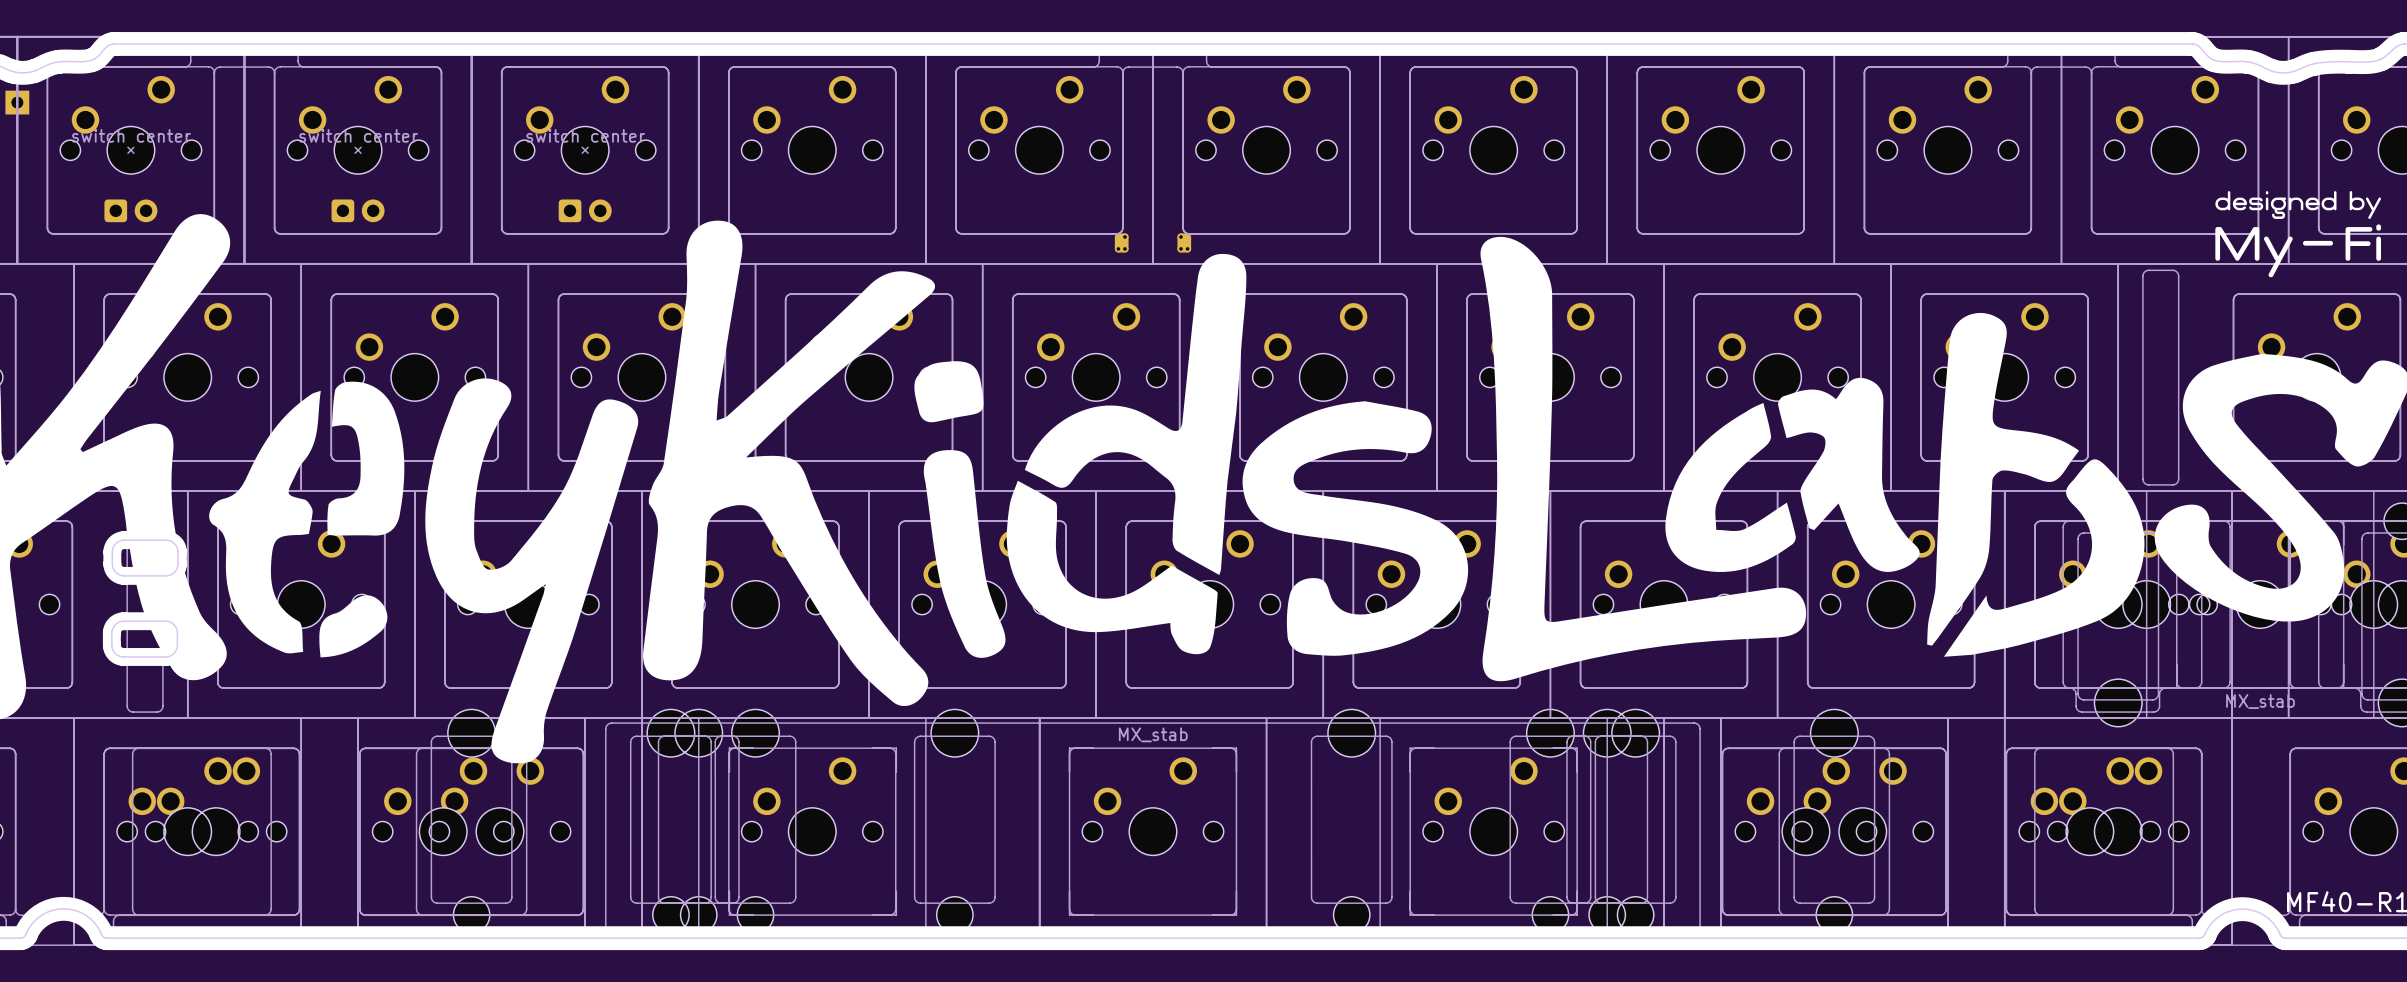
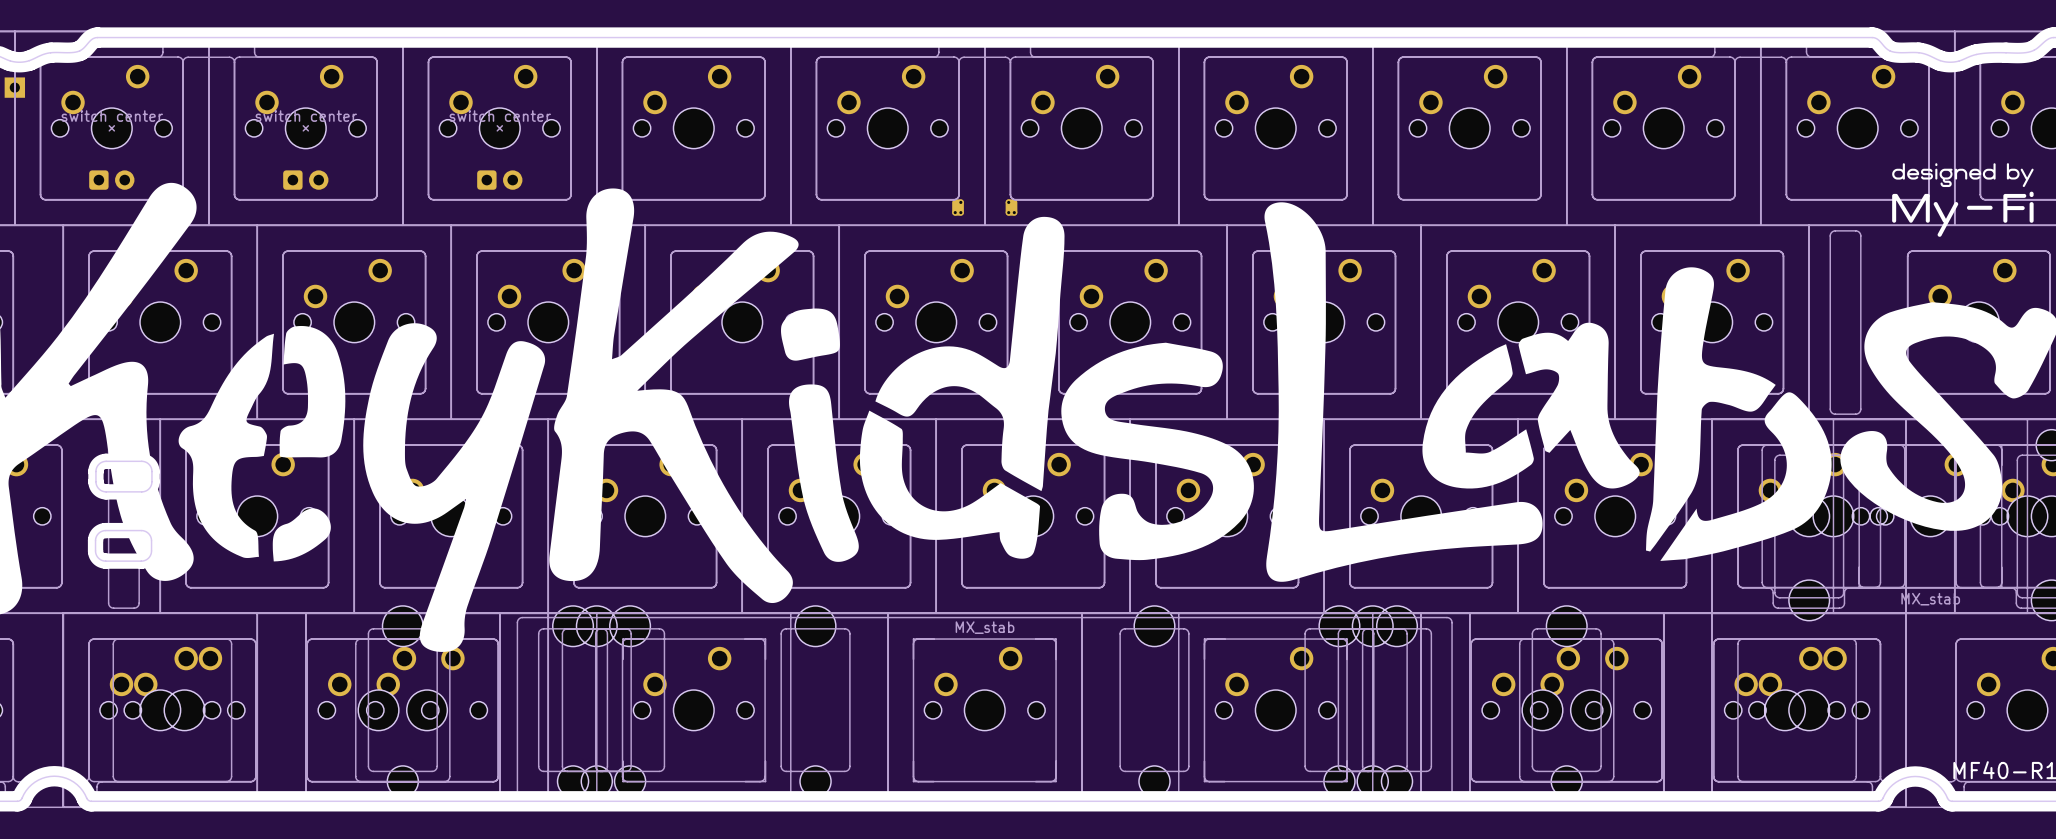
part footprint: [357, 709, 1949, 946] -> [305, 605, 1665, 808]

